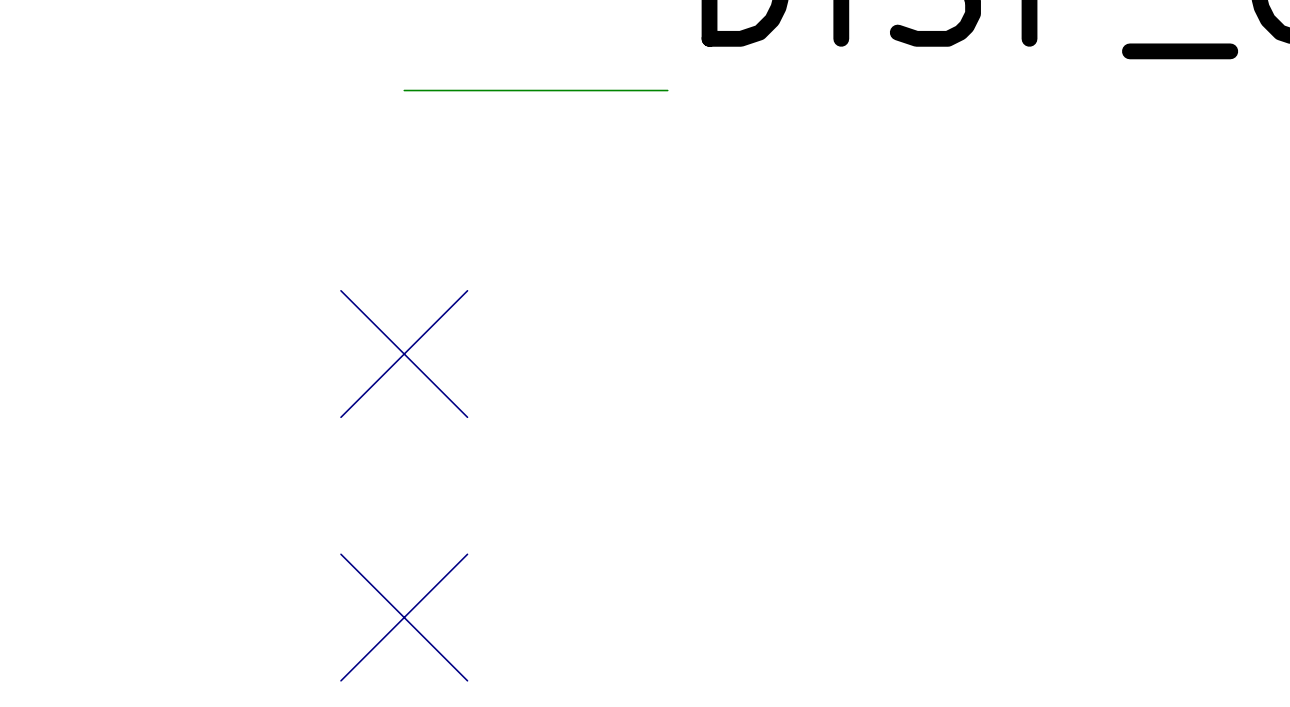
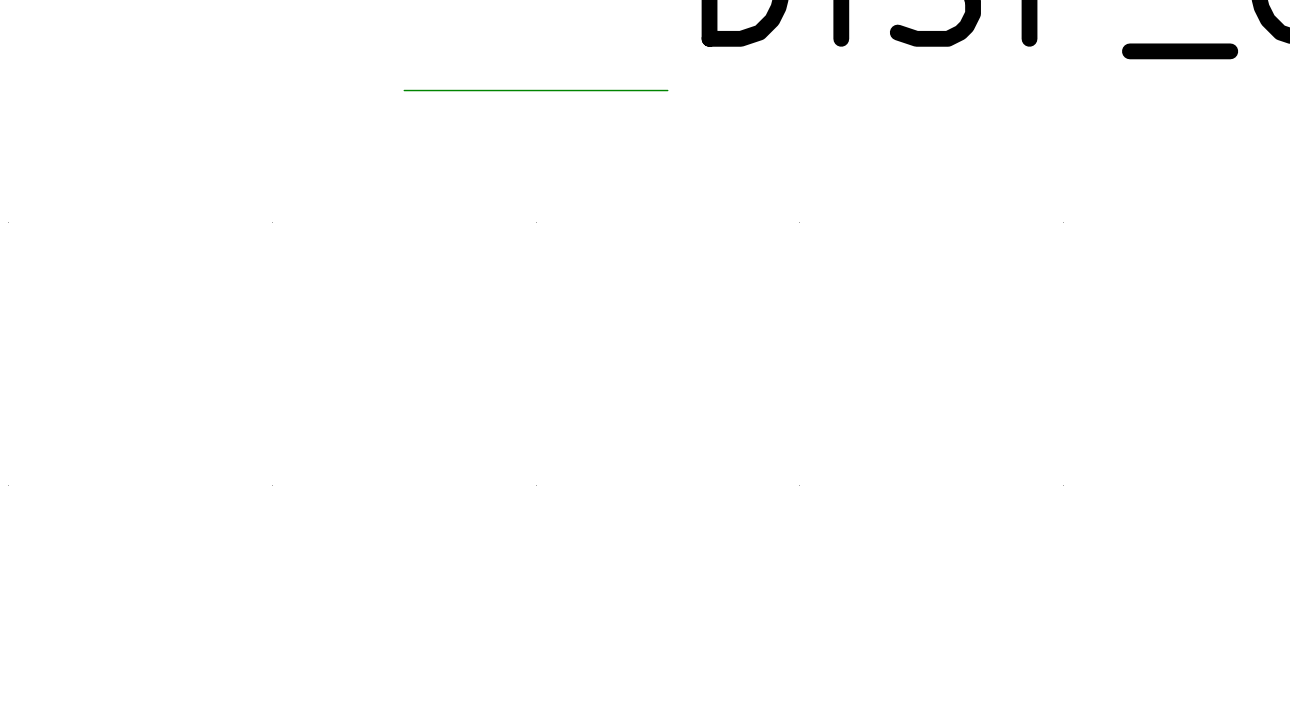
no-connect mark: (404, 354) -> none
no-connect mark: (404, 617) -> none

